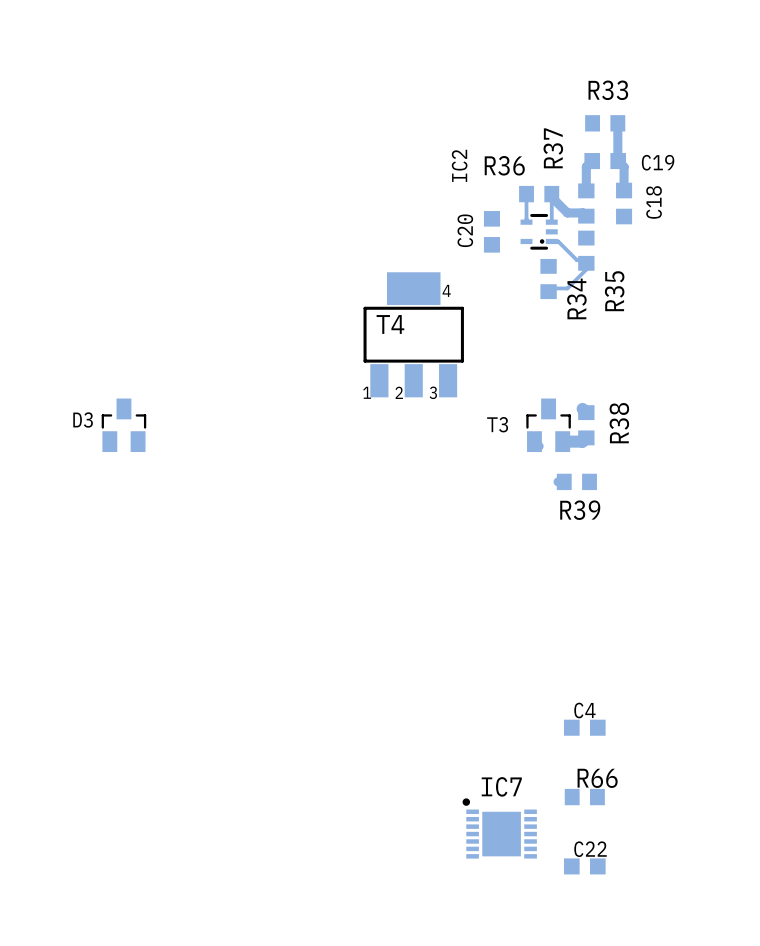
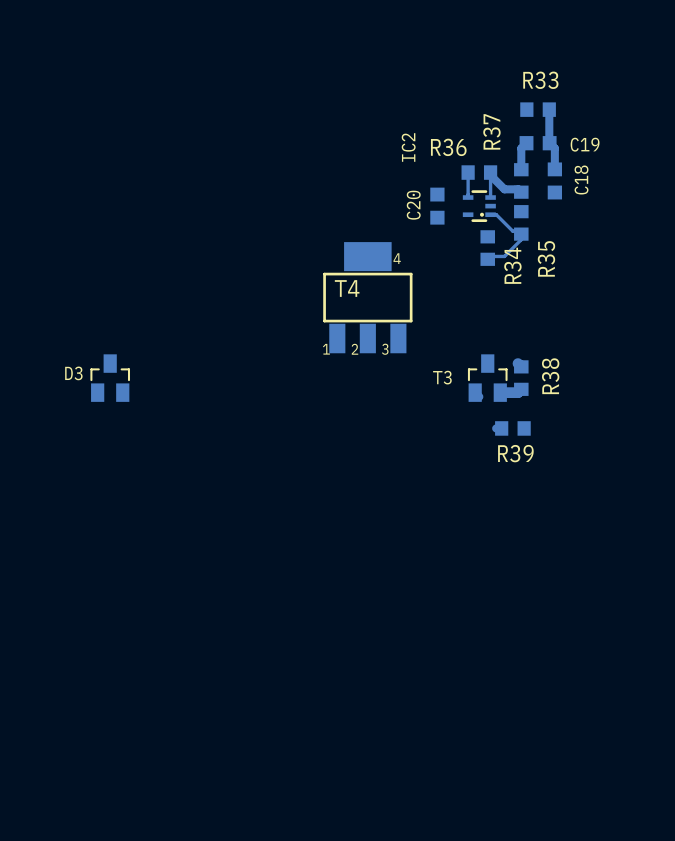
C4: (584, 727) -> none
R66: (584, 797) -> none
IC7: (499, 828) -> none
C22: (584, 866) -> none

